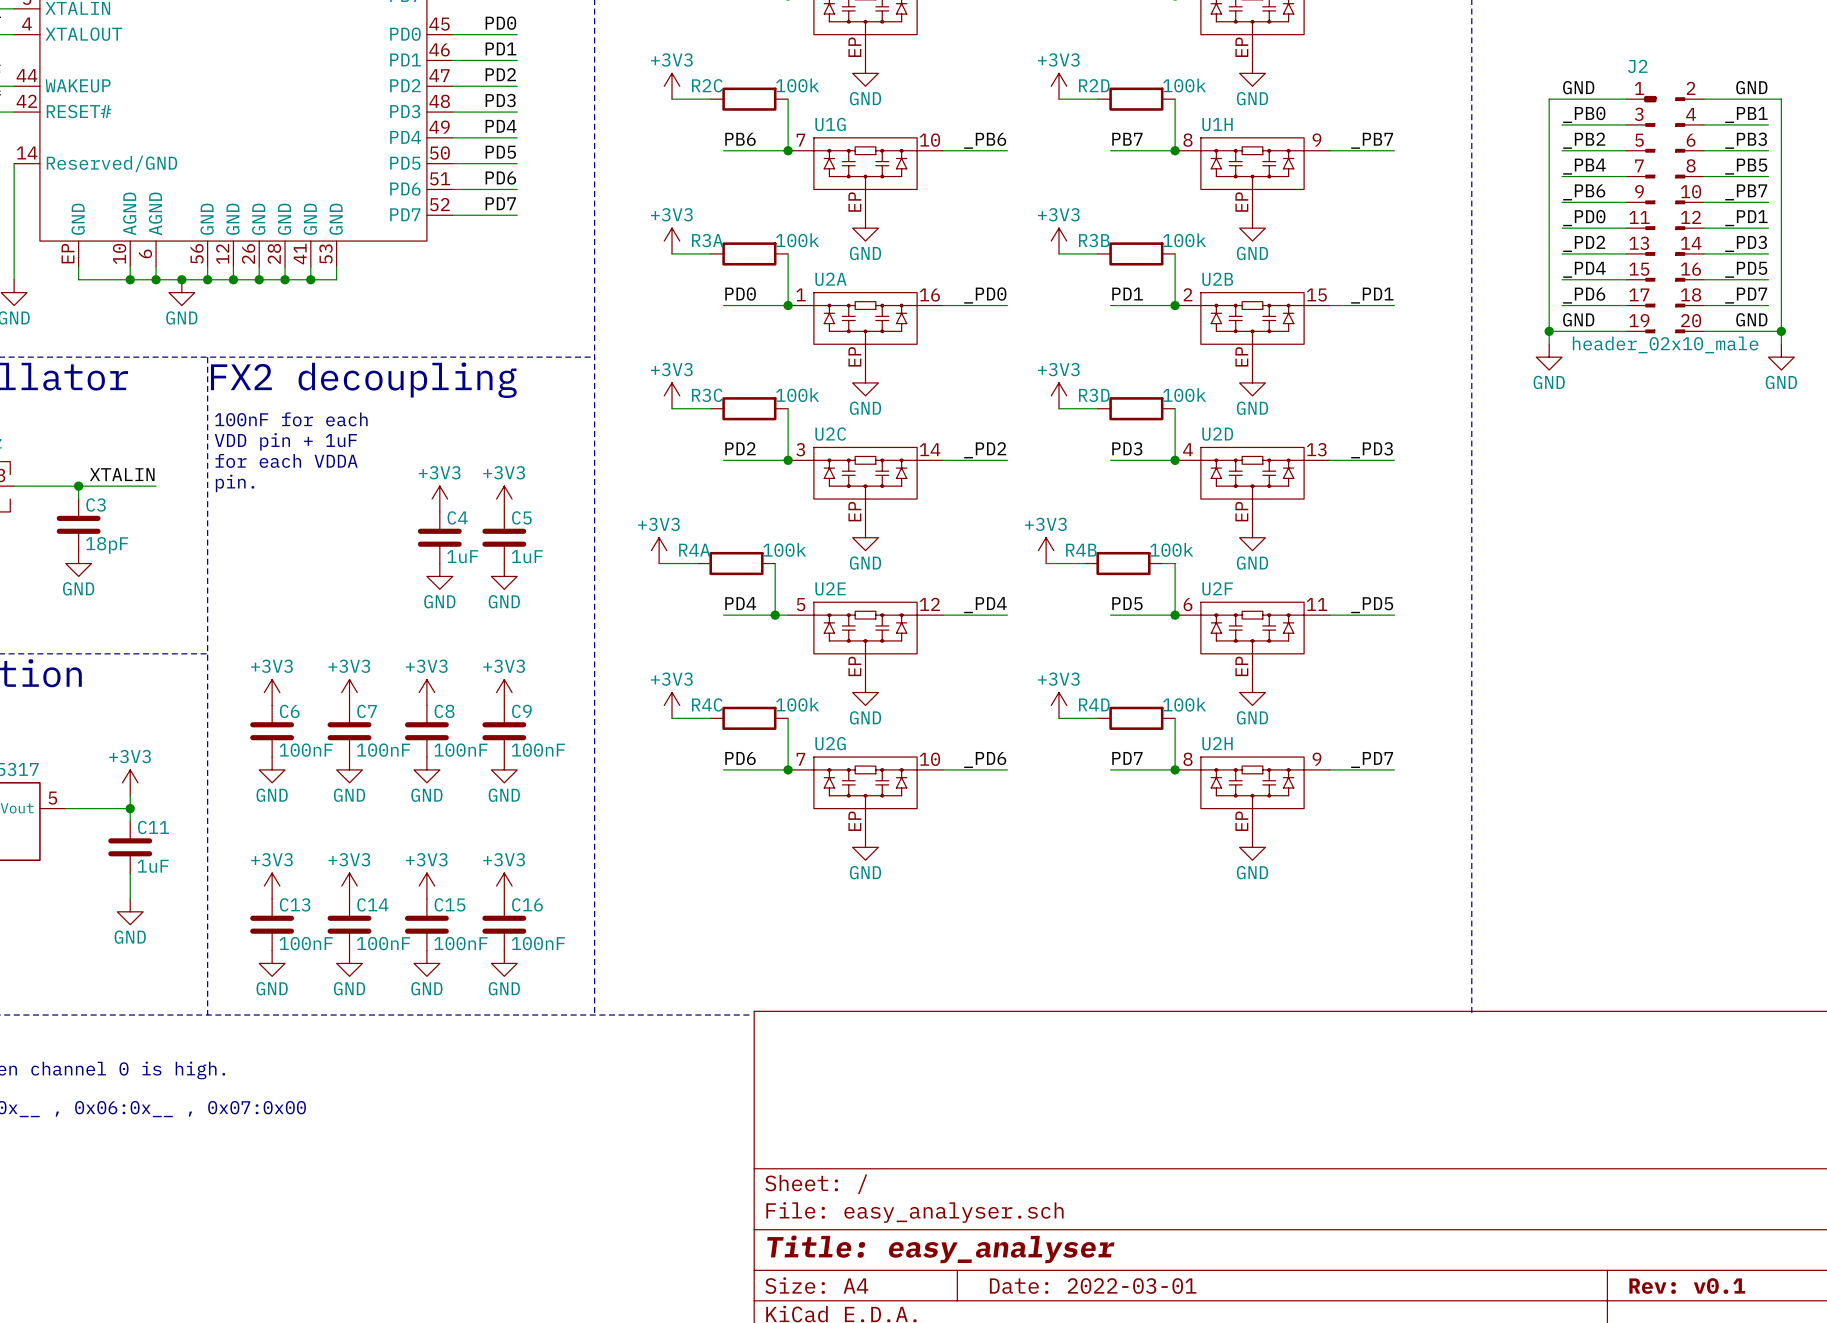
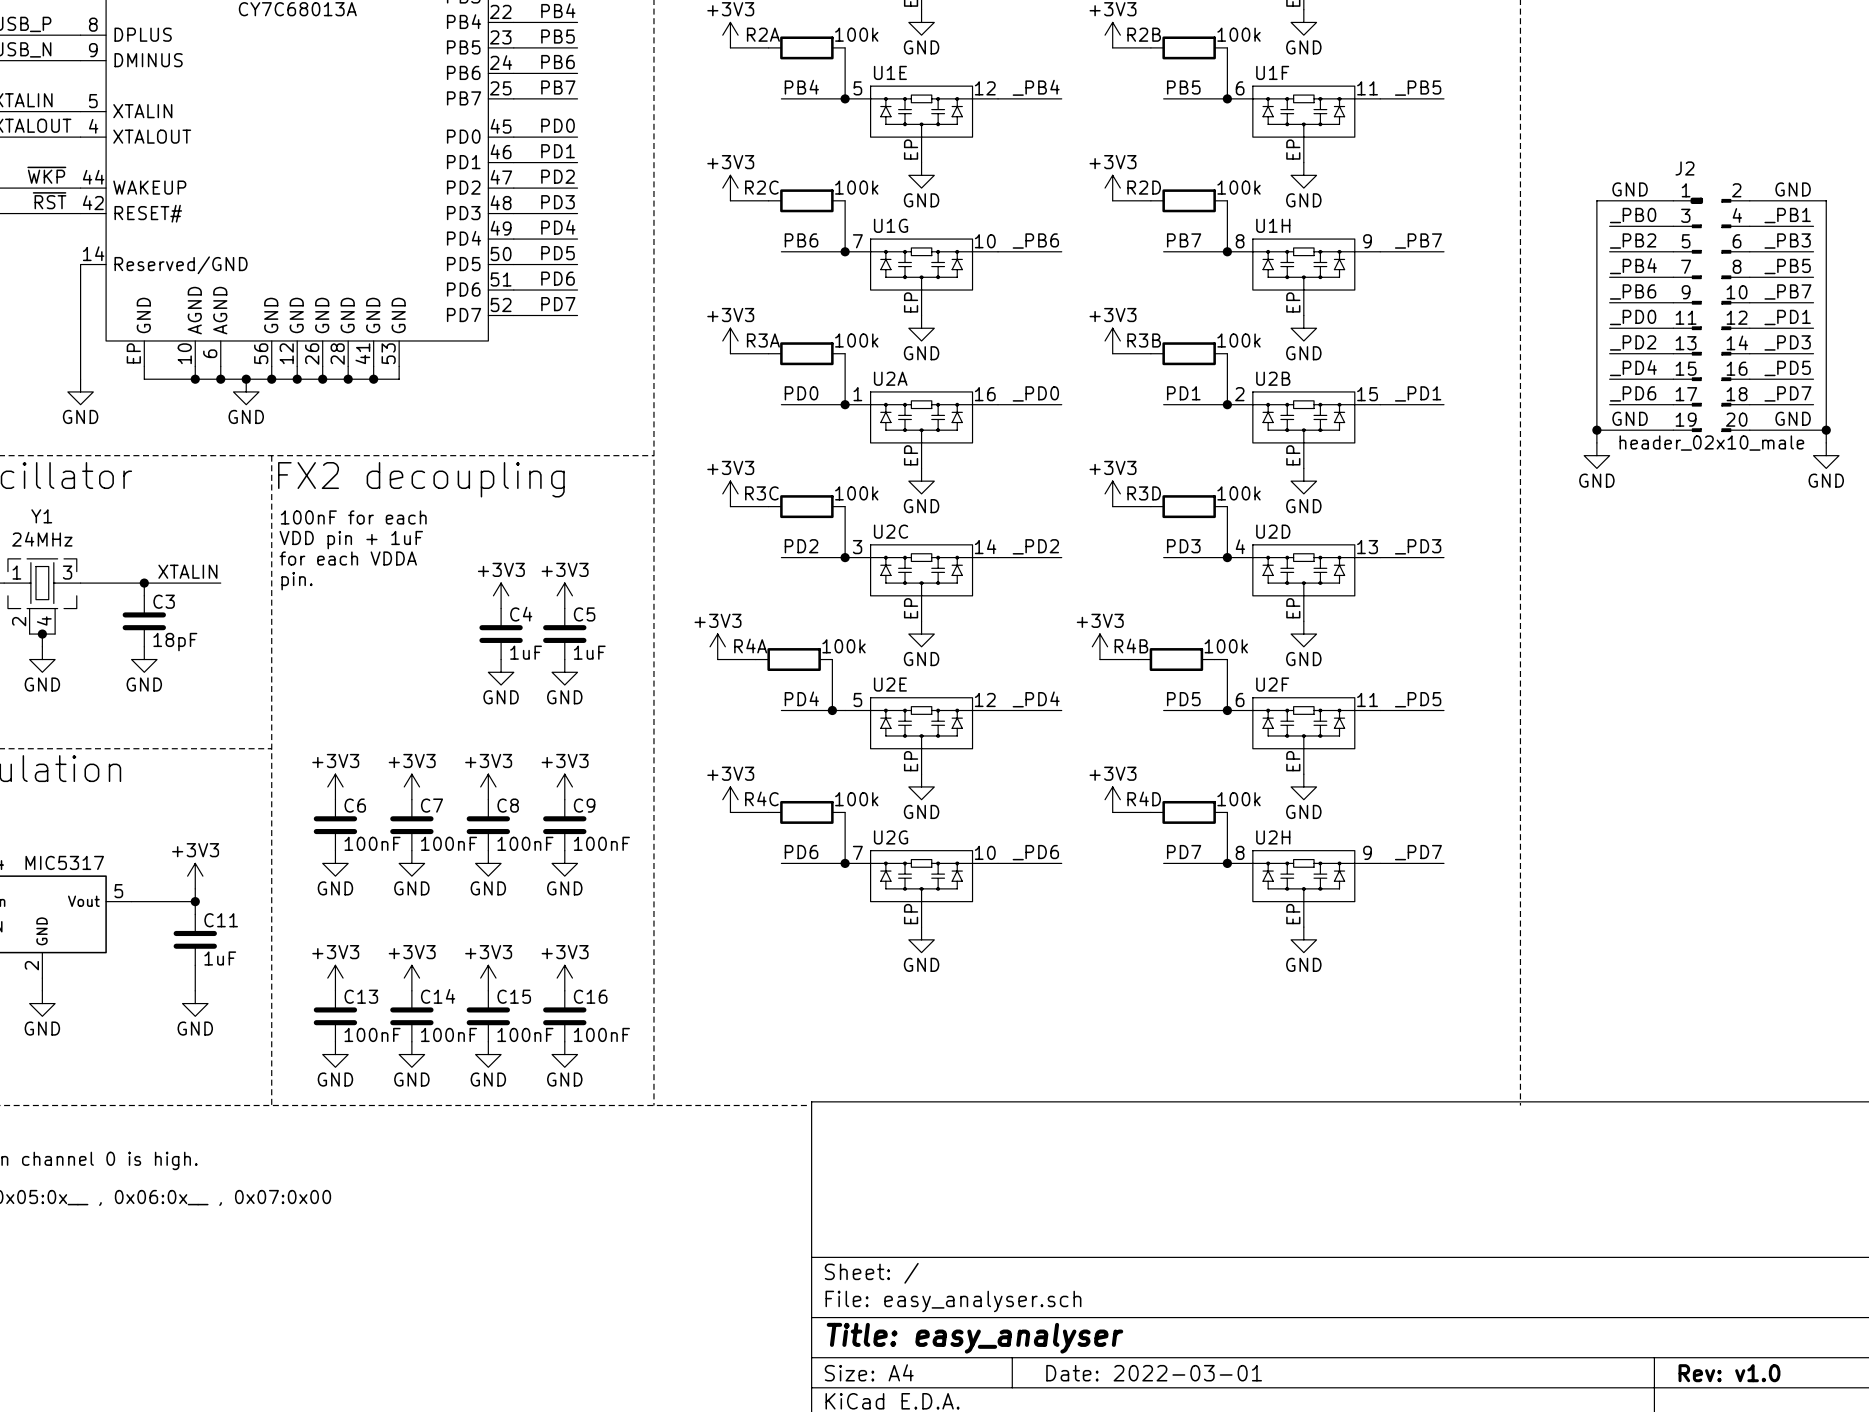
title block: Rev: v0.1 (1687, 1286) -> Rev: v1.0 (1729, 1373)

